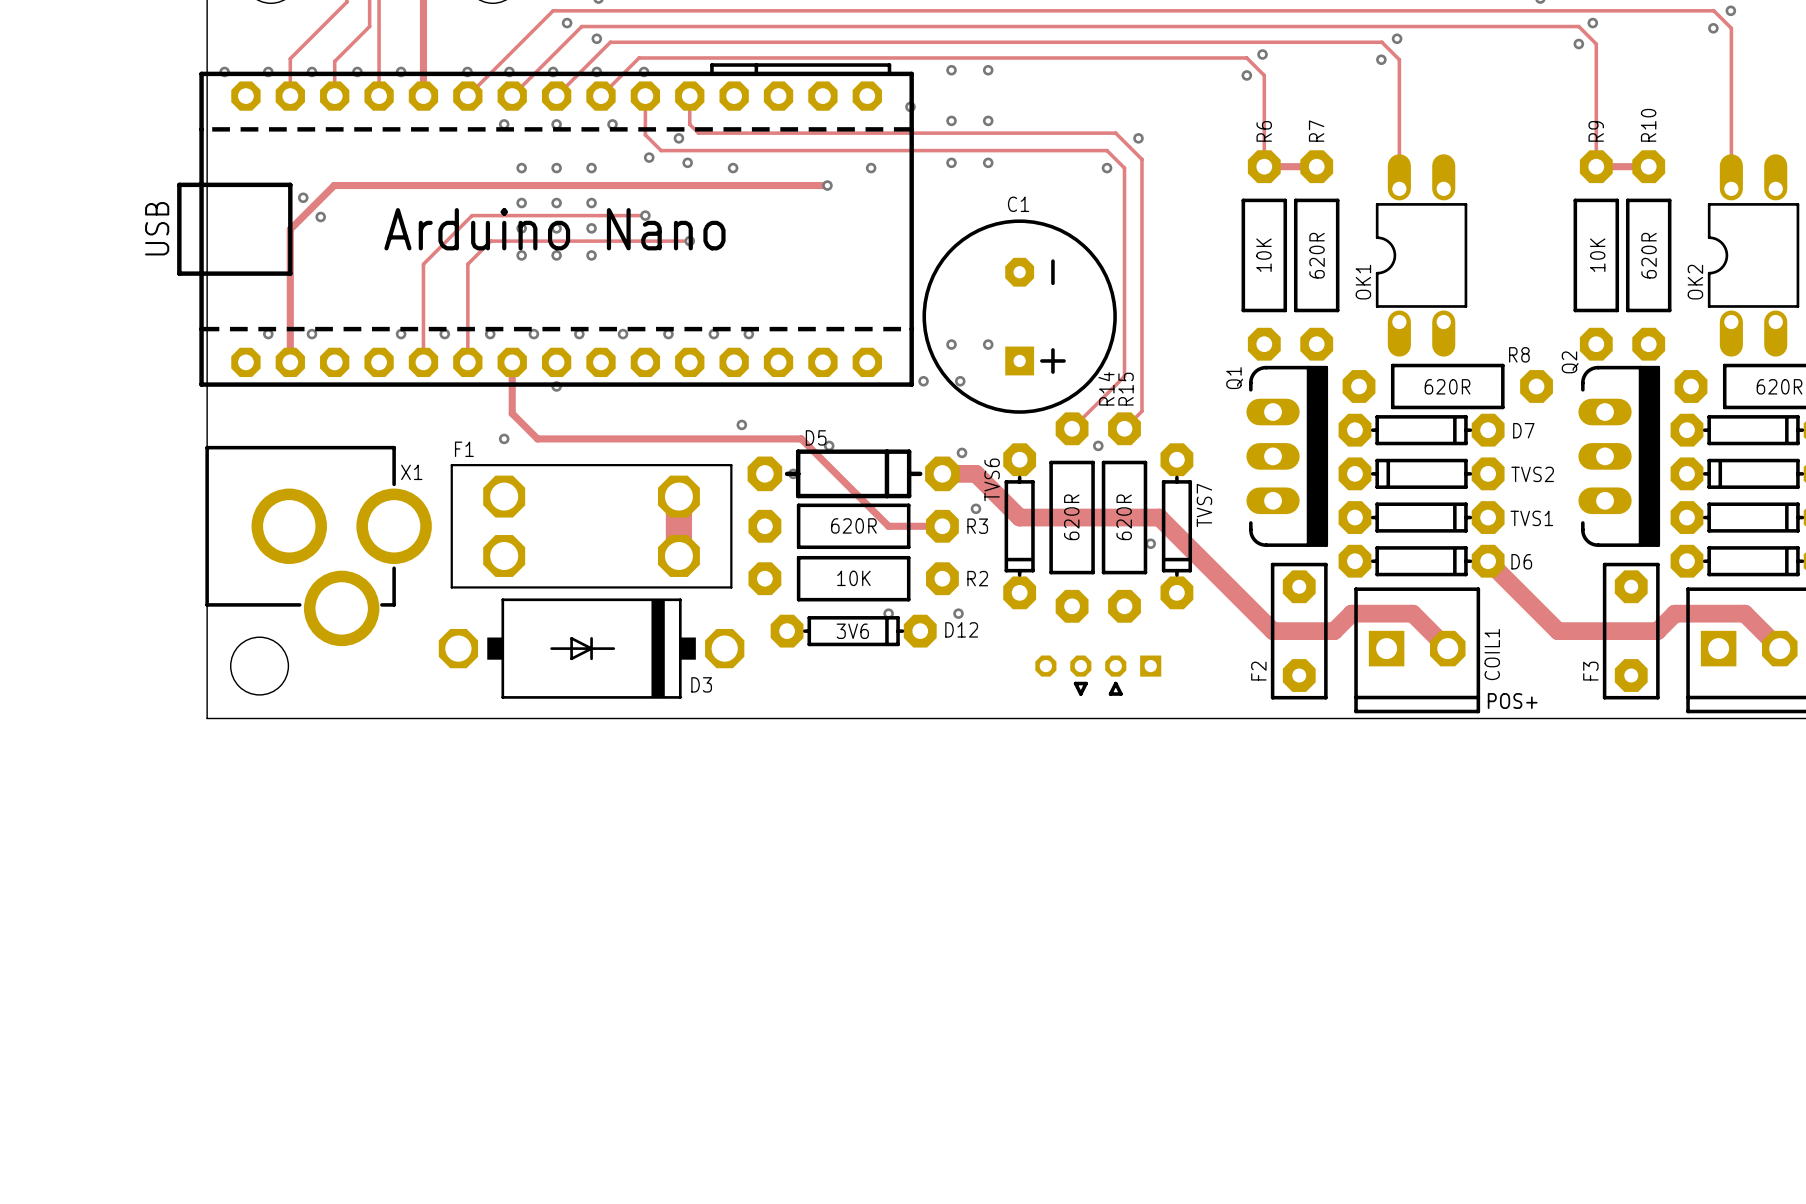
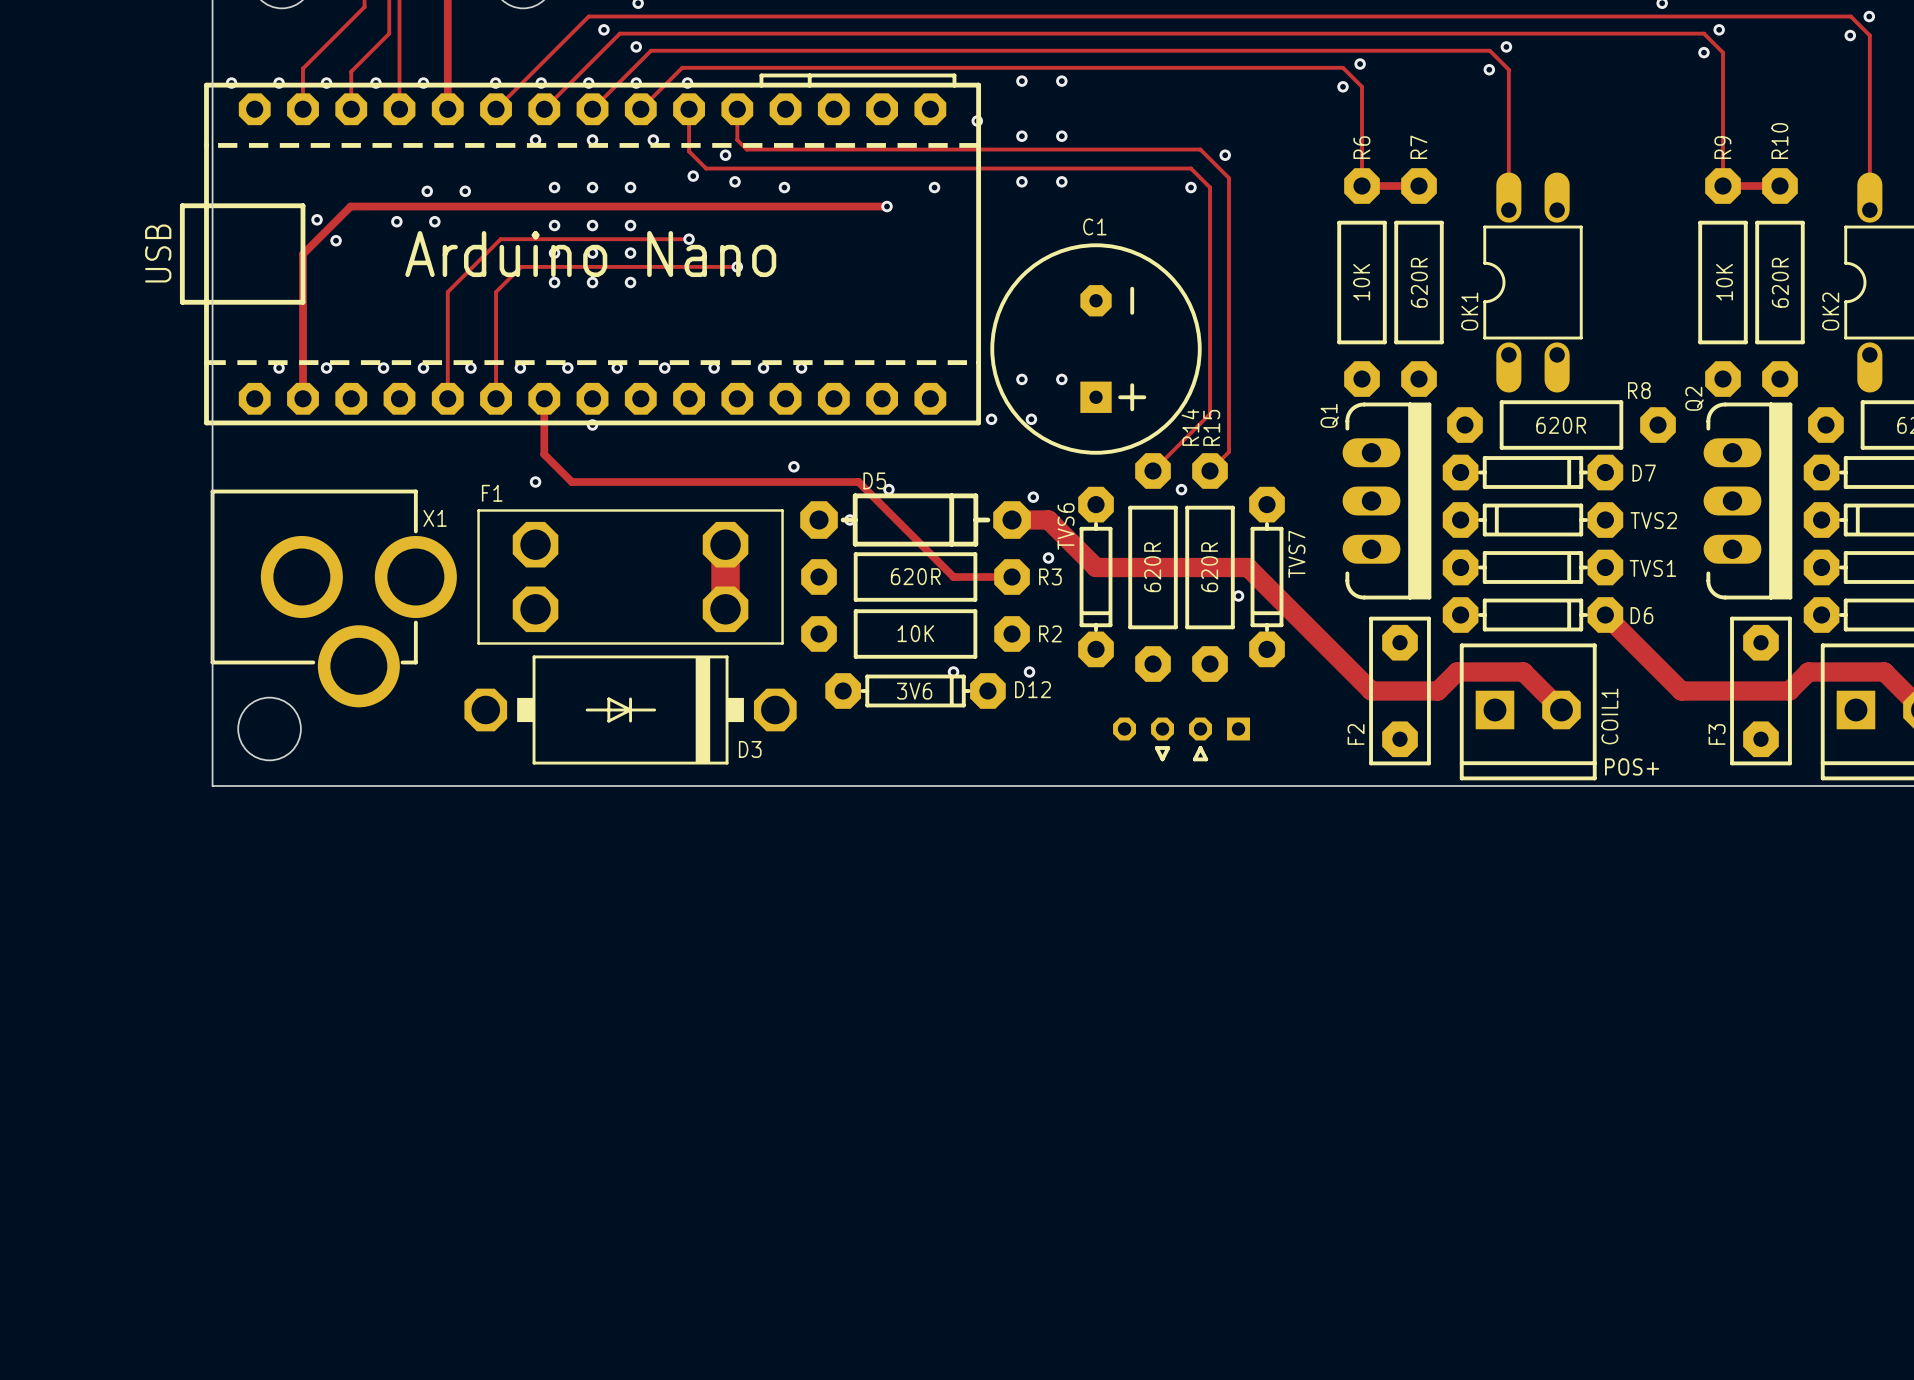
via: none -> (427, 191)
via: none -> (465, 191)
via: none -> (396, 221)
via: none -> (434, 221)
via: none -> (383, 368)

